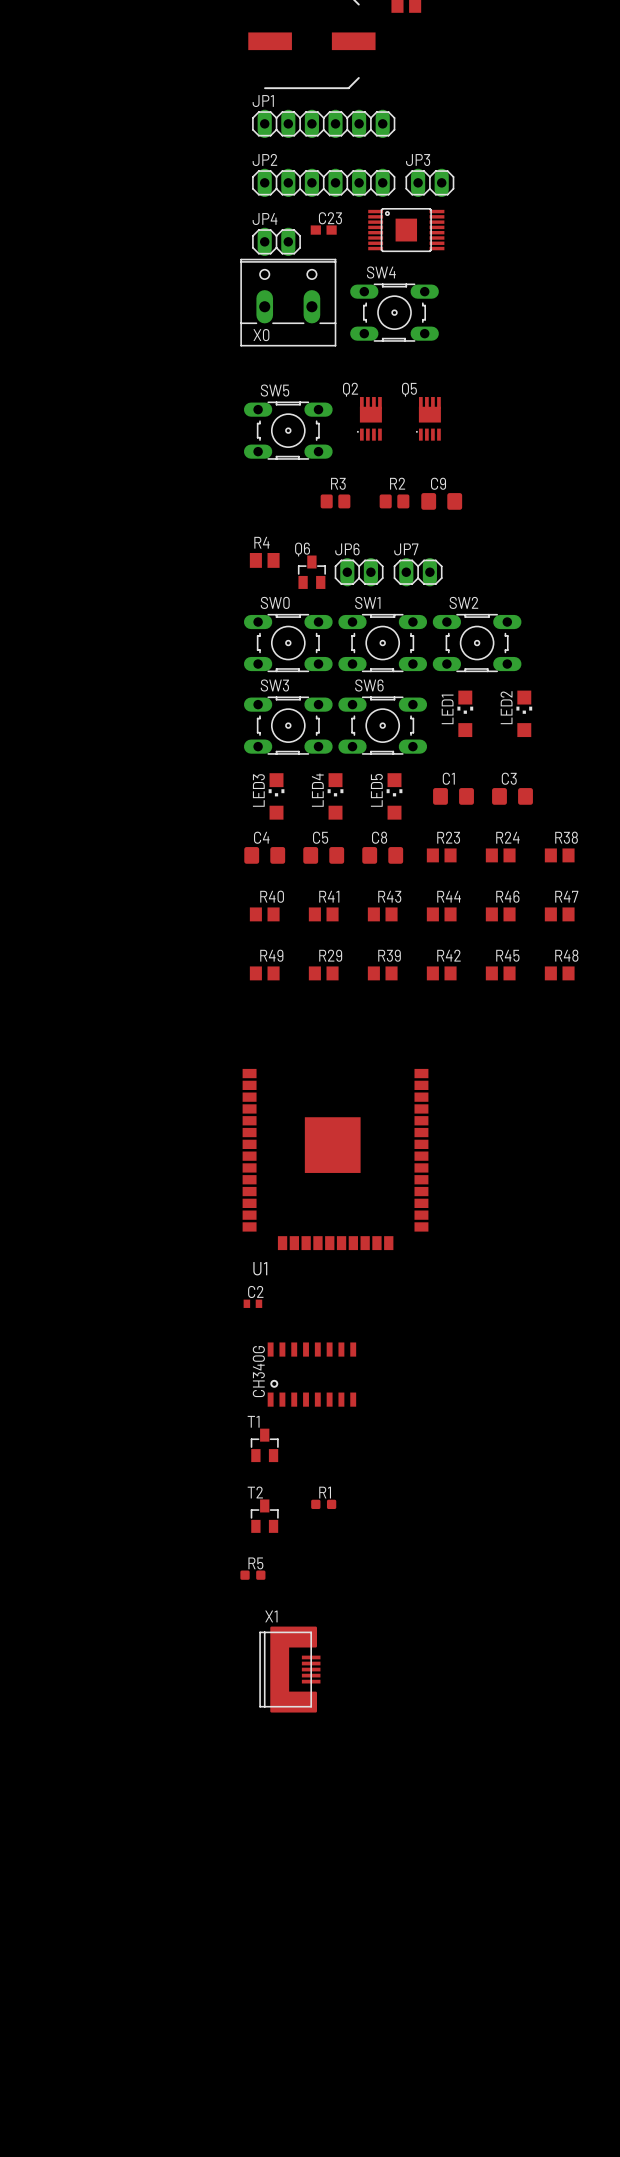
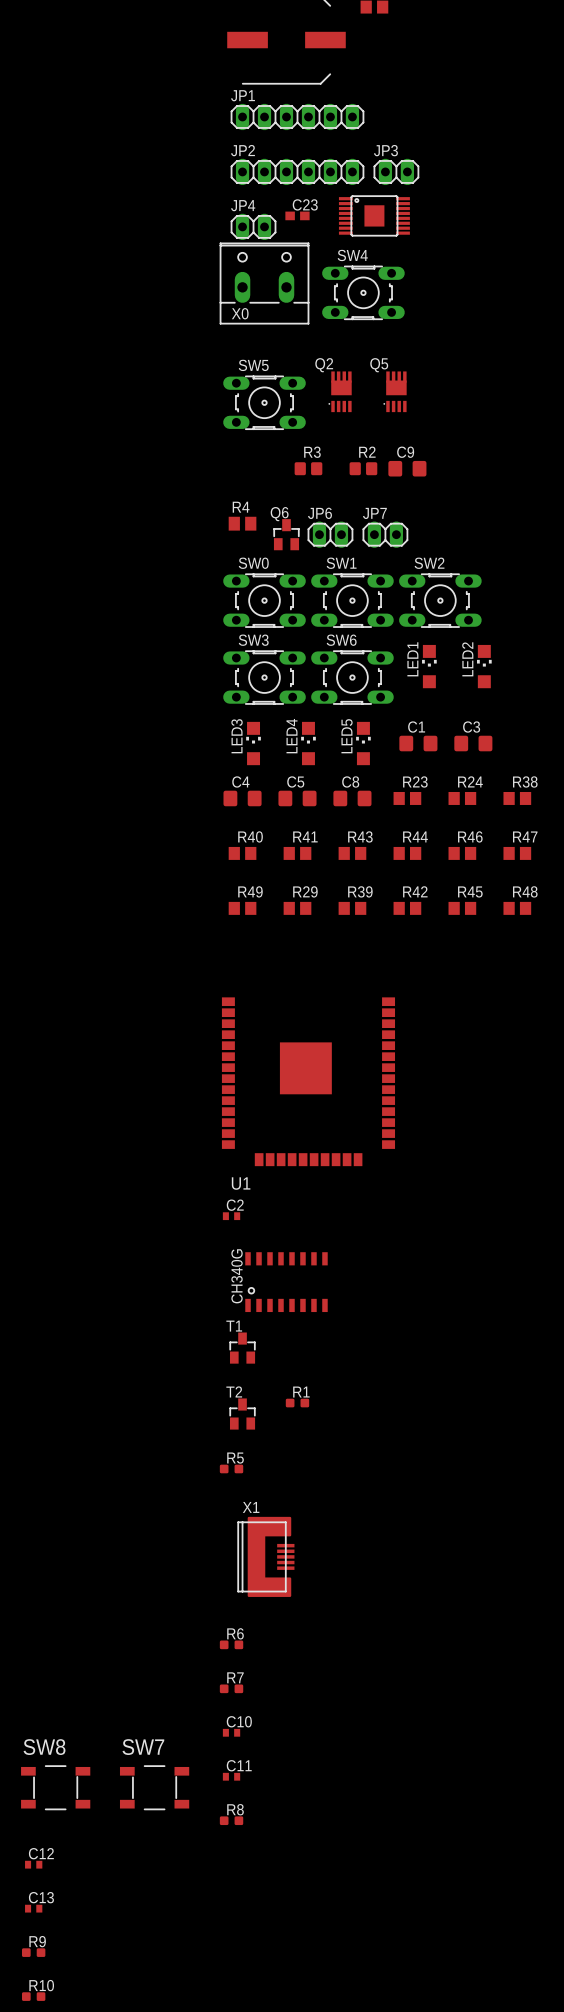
R6: none -> (231, 1644)
R7: none -> (231, 1688)
C10: none -> (231, 1732)
C11: none -> (231, 1776)
SW8: none -> (55, 1787)
SW7: none -> (154, 1787)
R8: none -> (231, 1820)
C12: none -> (33, 1864)
C13: none -> (33, 1908)
R9: none -> (33, 1952)
R10: none -> (33, 1996)

